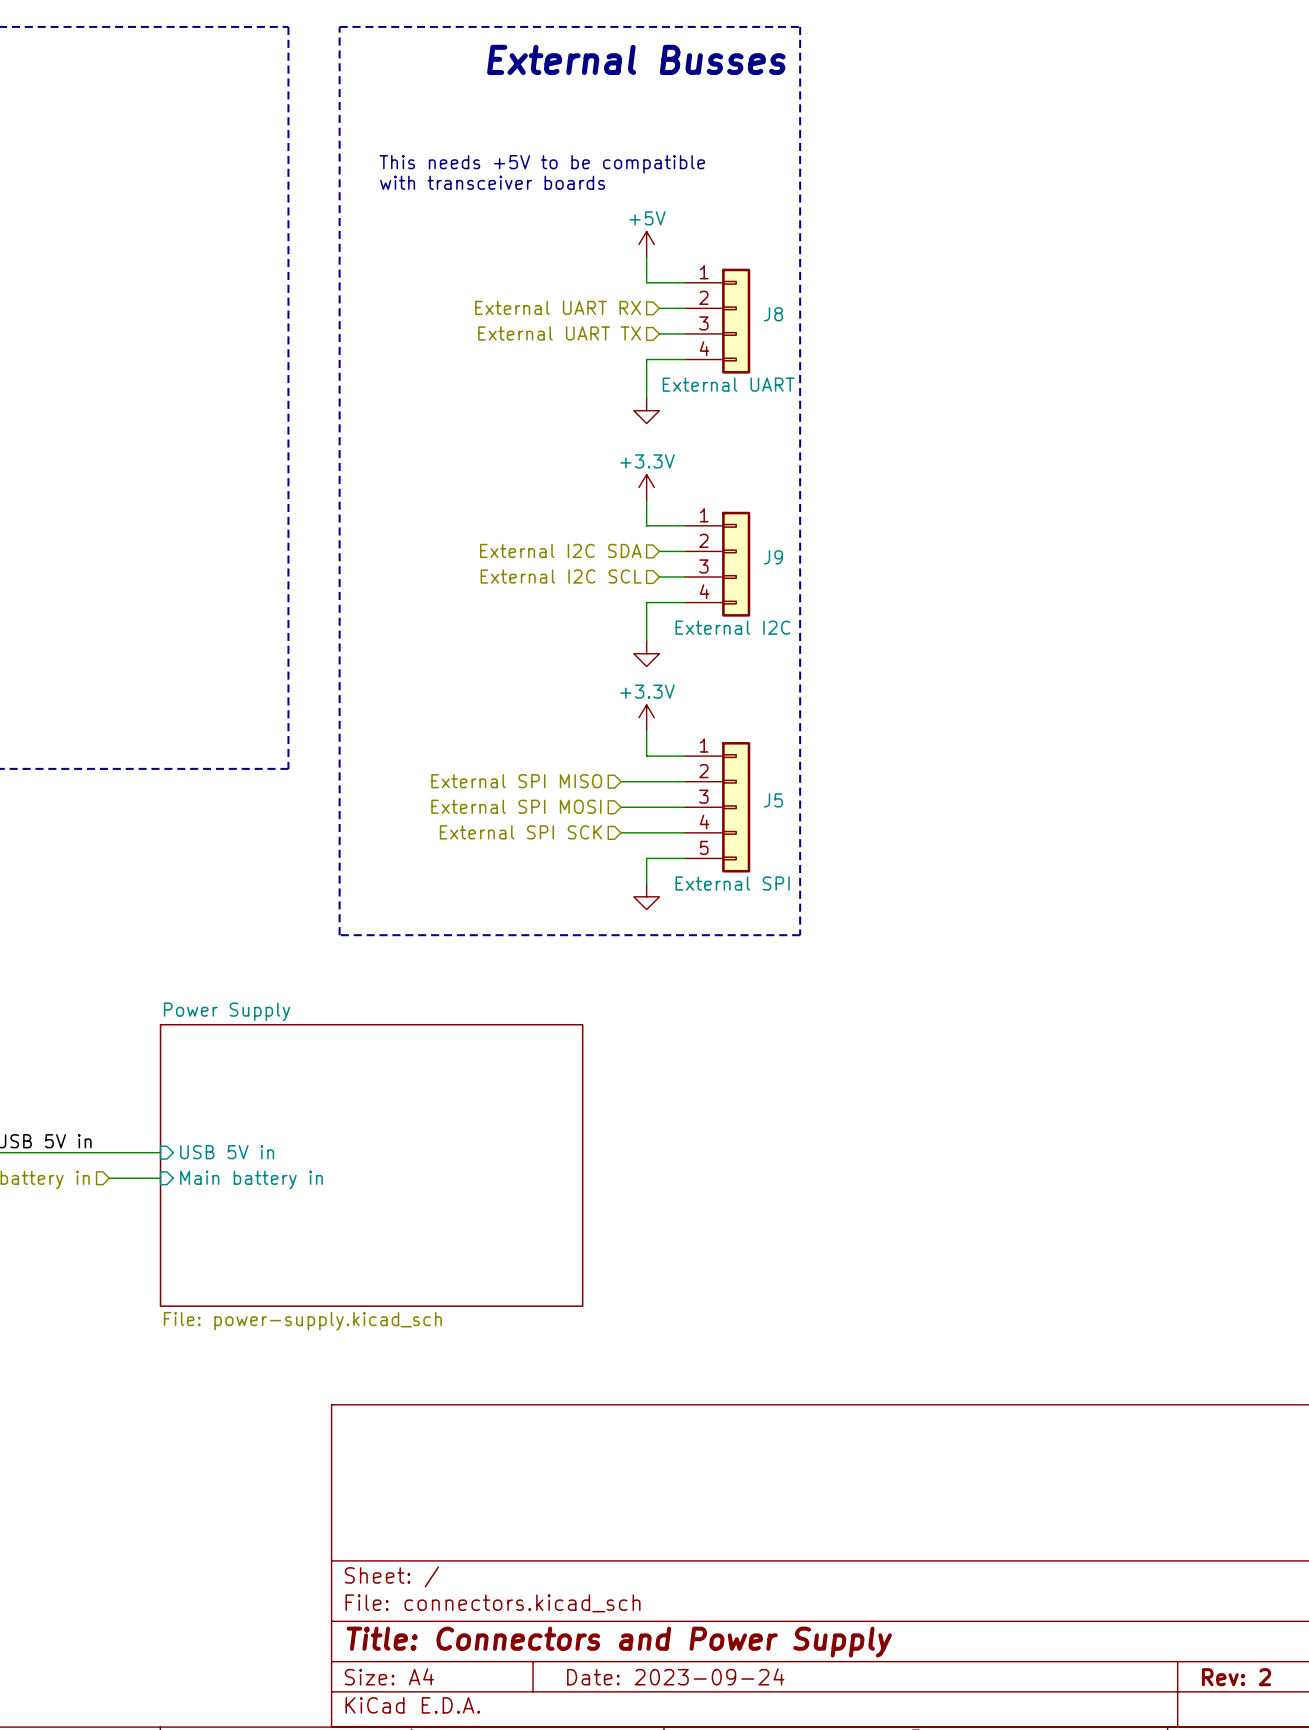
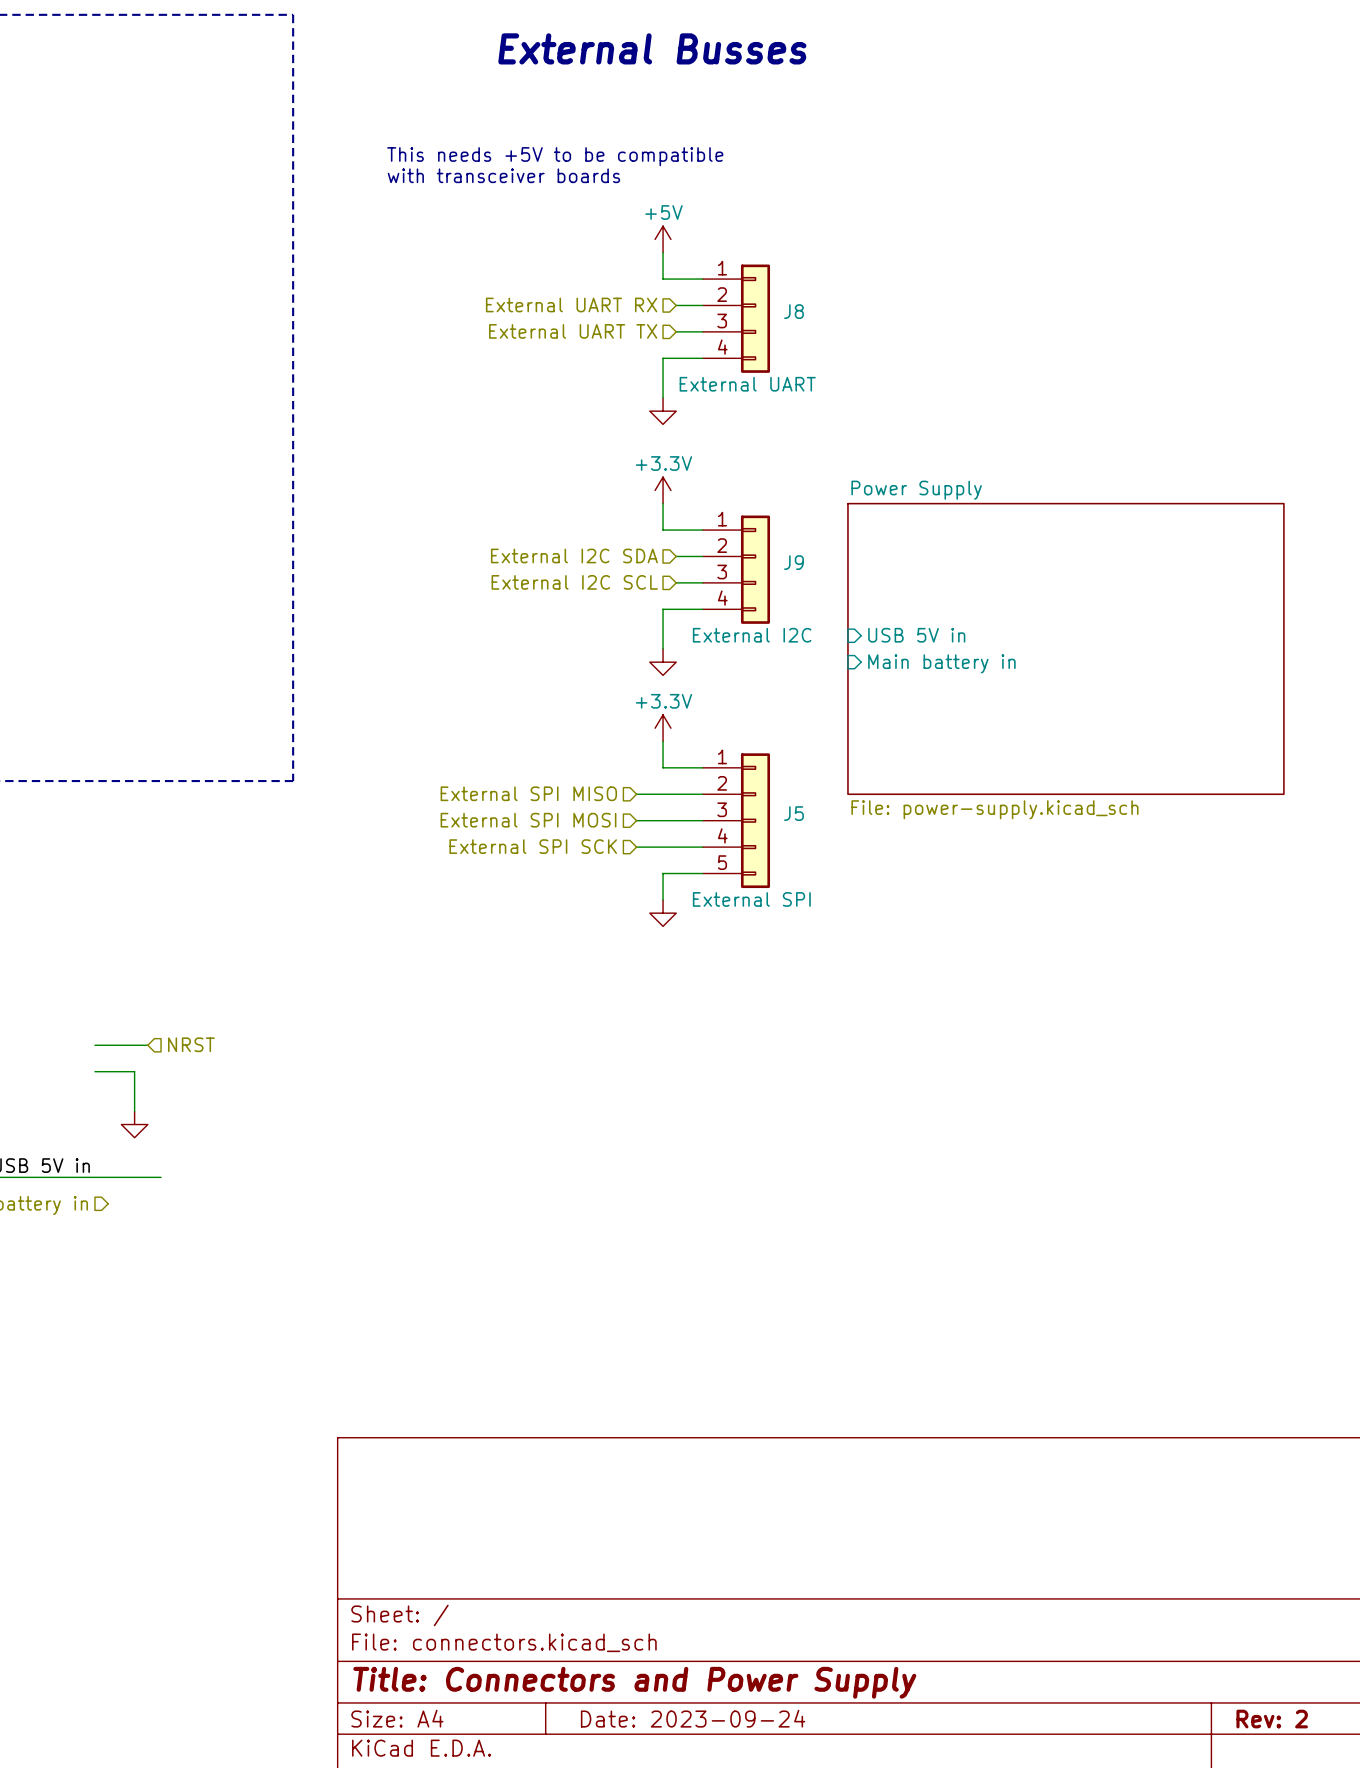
line: (339, 26) (800, 26) (800, 935) (339, 935) (339, 26) -> none
sheet pin: none -> USB 5V in (916, 635)
sheet Power Supply: none -> File: power-supply.kicad_sch (1065, 648)
sheet pin: none -> Main battery in (941, 663)
hierarchical label: none -> NRST (191, 1044)
wire: none -> (94, 1071) (134, 1071) (134, 1111)
power symbol: none -> (134, 1124)
sheet pin: USB 5V in (227, 1152) -> none
sheet Power Supply: File: power-supply.kicad_sch (371, 1165) -> none
wire: (109, 1178) (160, 1178) -> (94, 1045) (147, 1045)
sheet pin: Main battery in (251, 1179) -> none

